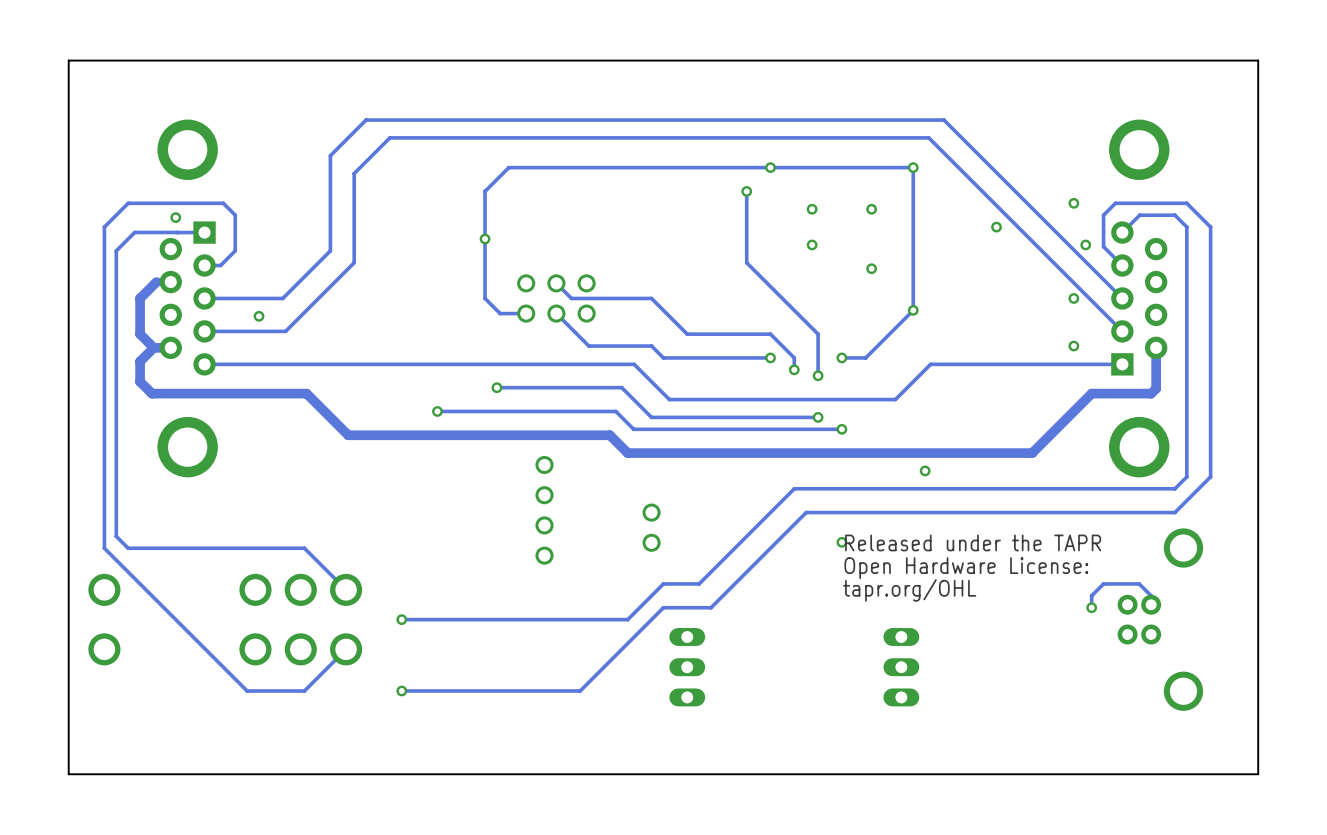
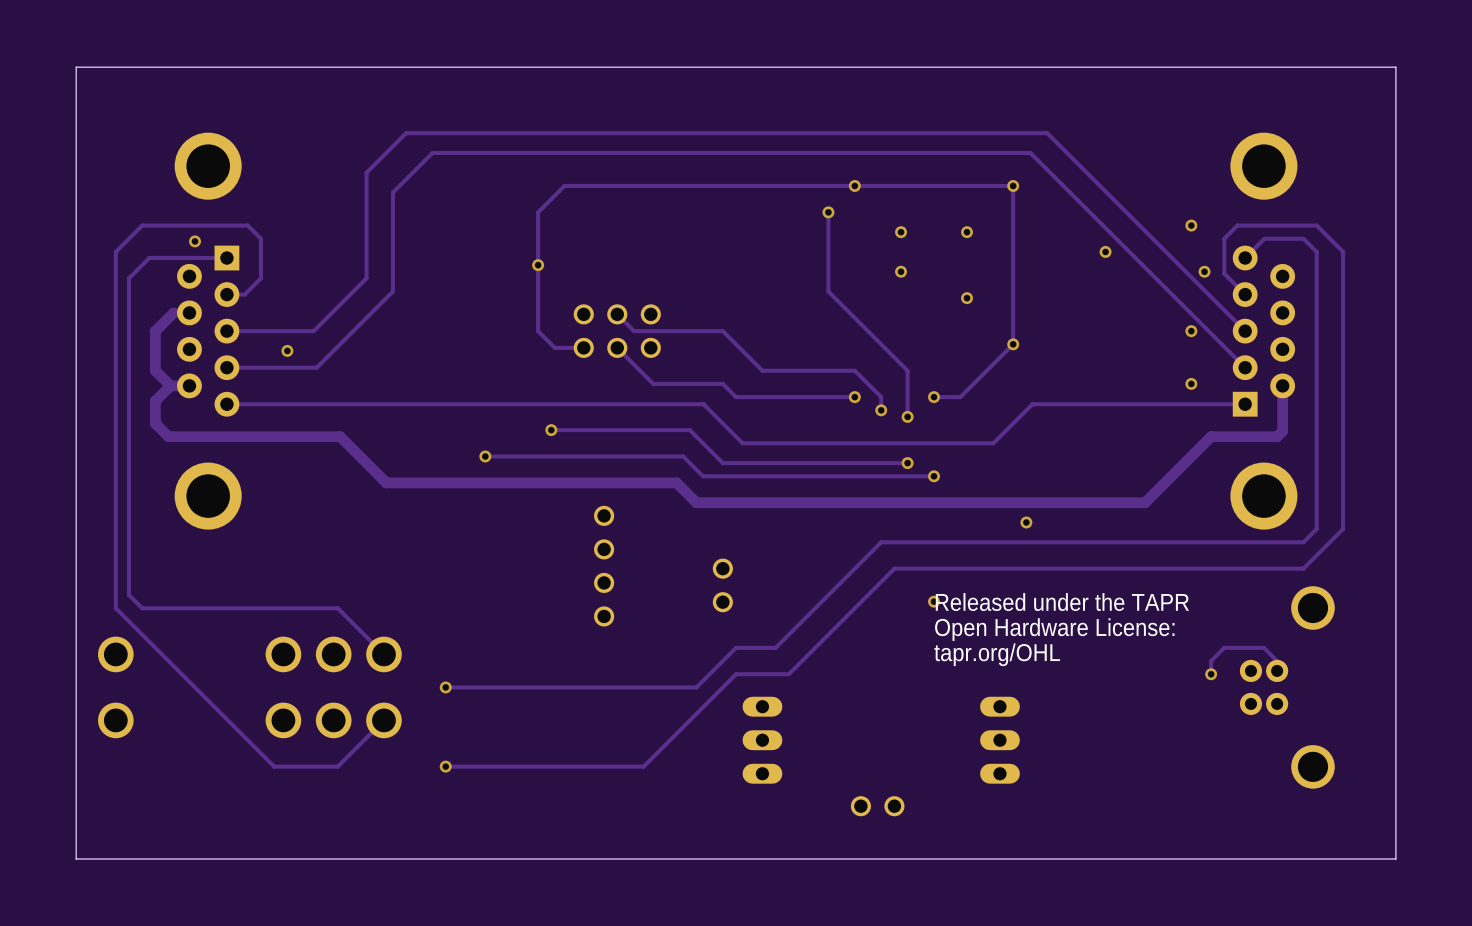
part: none -> (877, 806)

